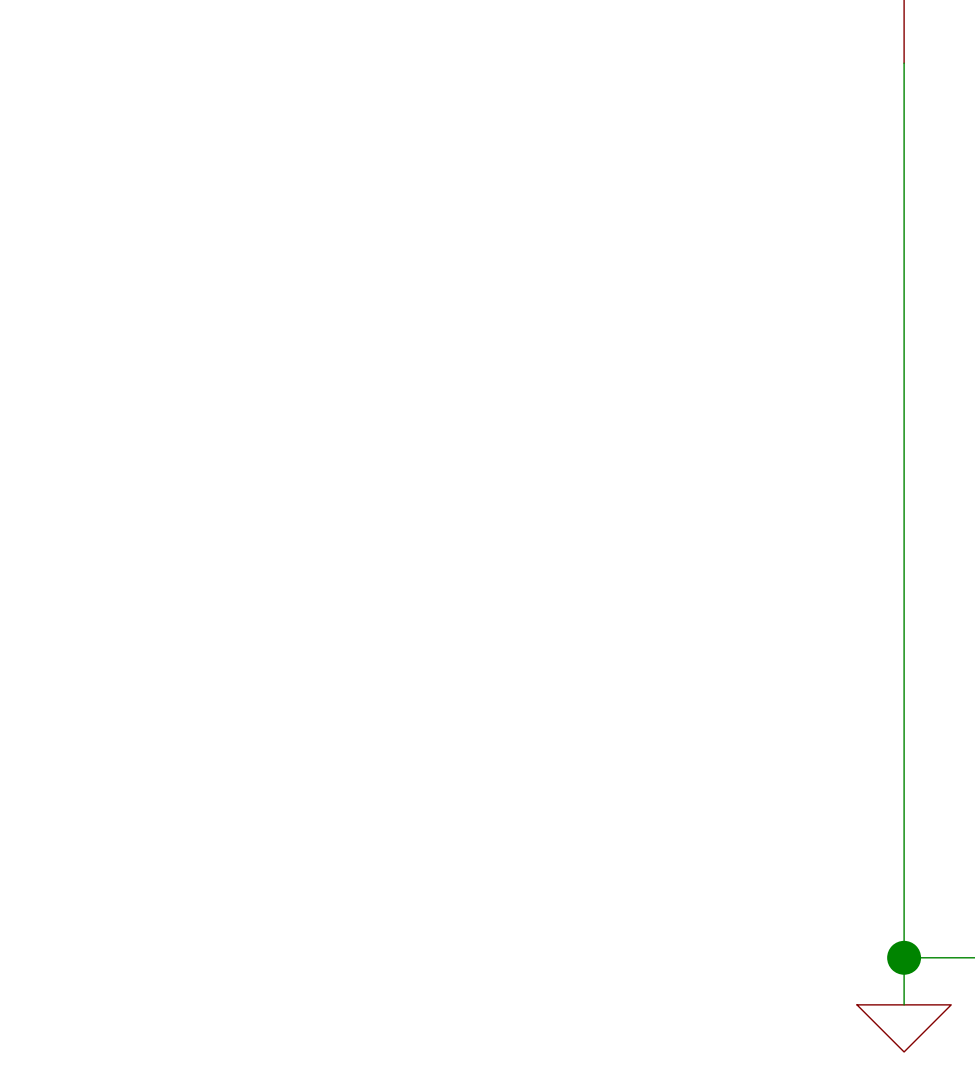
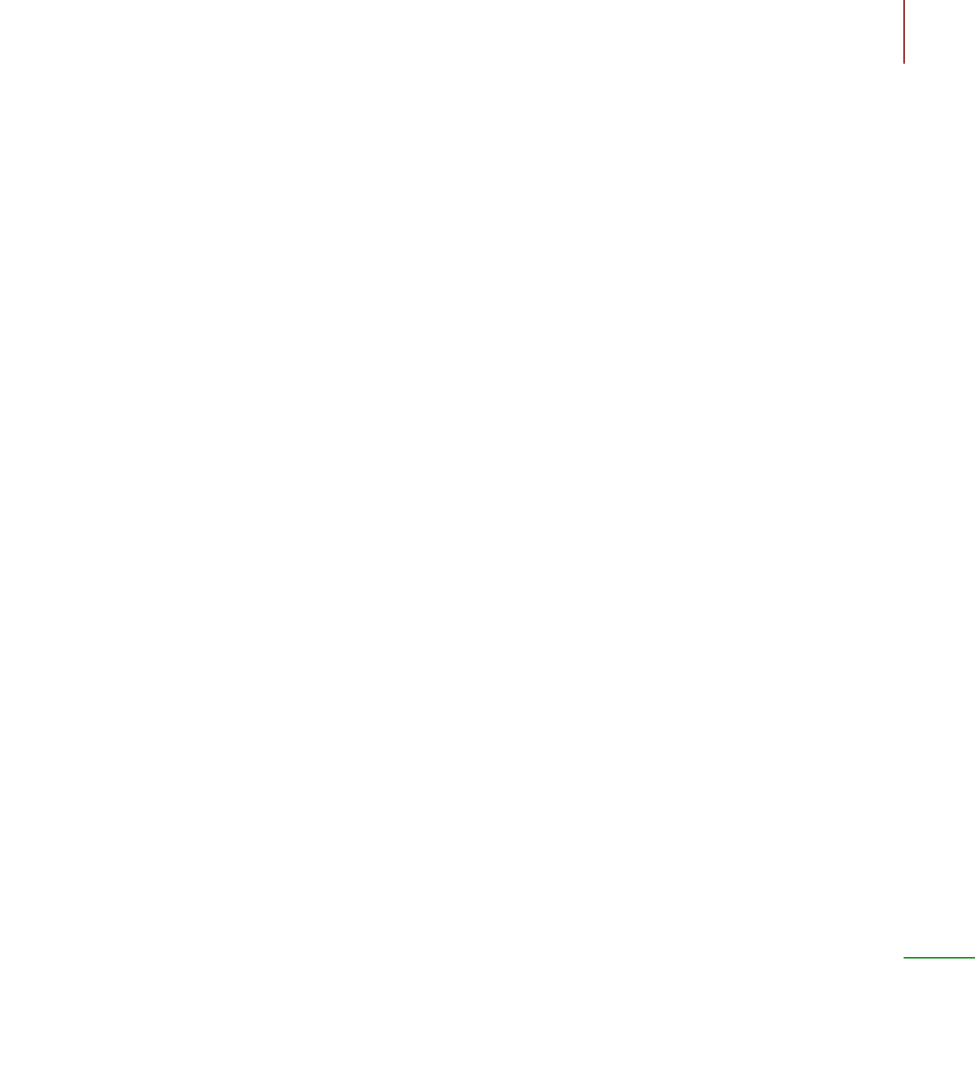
wire: (904, 63) (904, 1004) -> none
junction: (904, 957) -> none
power symbol: (904, 1028) -> none

